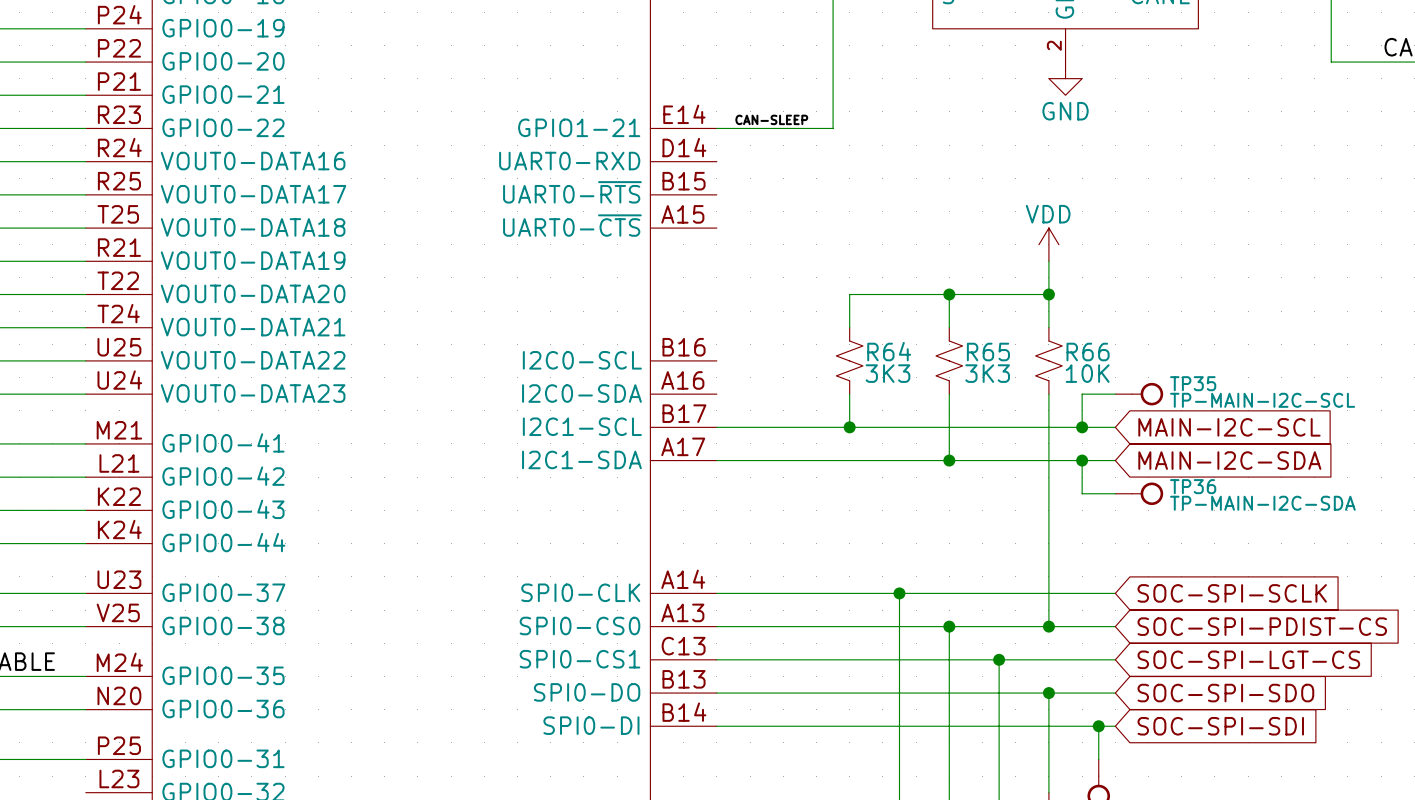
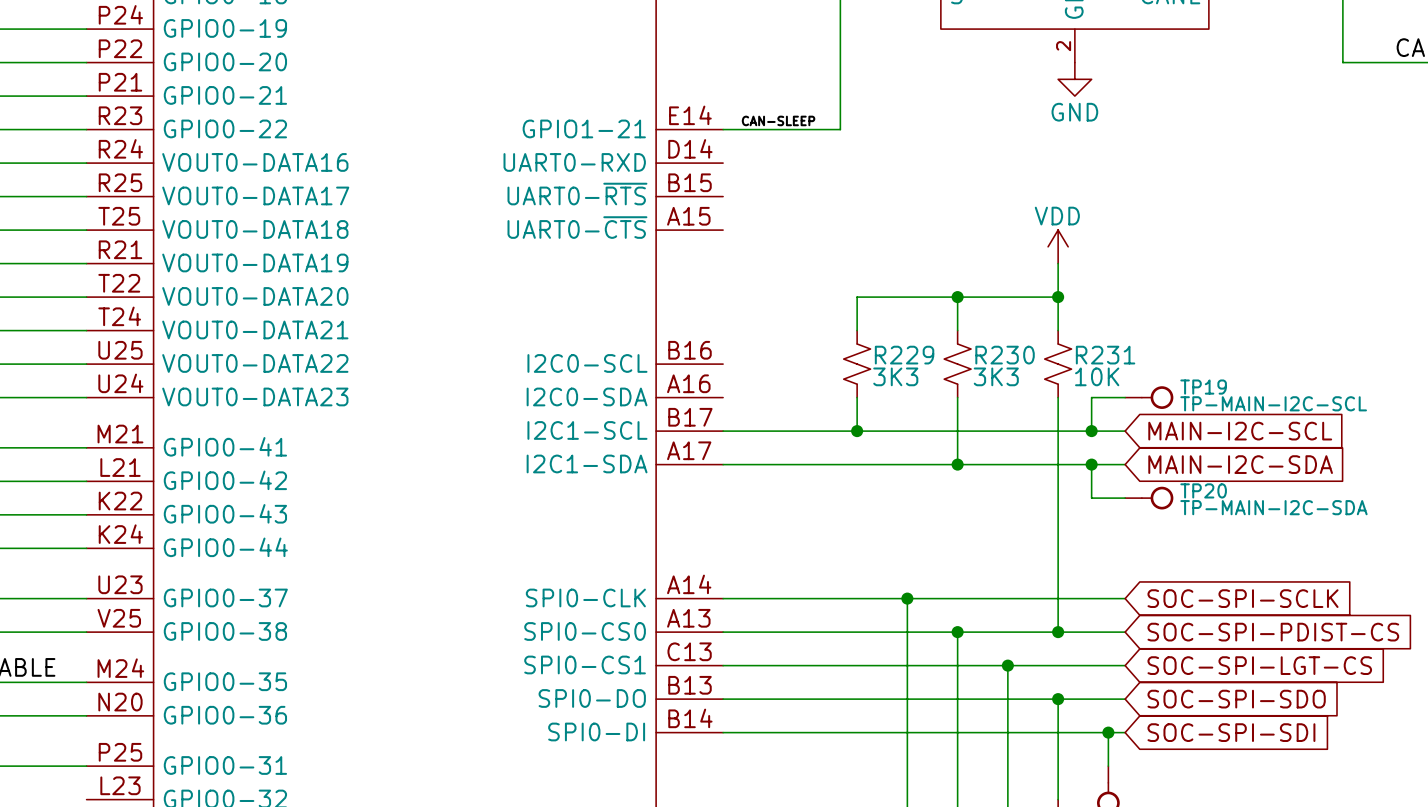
R64 name: R64 (889, 351) -> R229 (904, 355)
R65 name: R65 (988, 352) -> R230 (1005, 355)
R66 name: R66 (1088, 352) -> R231 (1105, 355)
TP35 name: TP35 (1193, 383) -> TP19 (1203, 387)
TP36 name: TP36 (1193, 486) -> TP20 (1203, 490)

